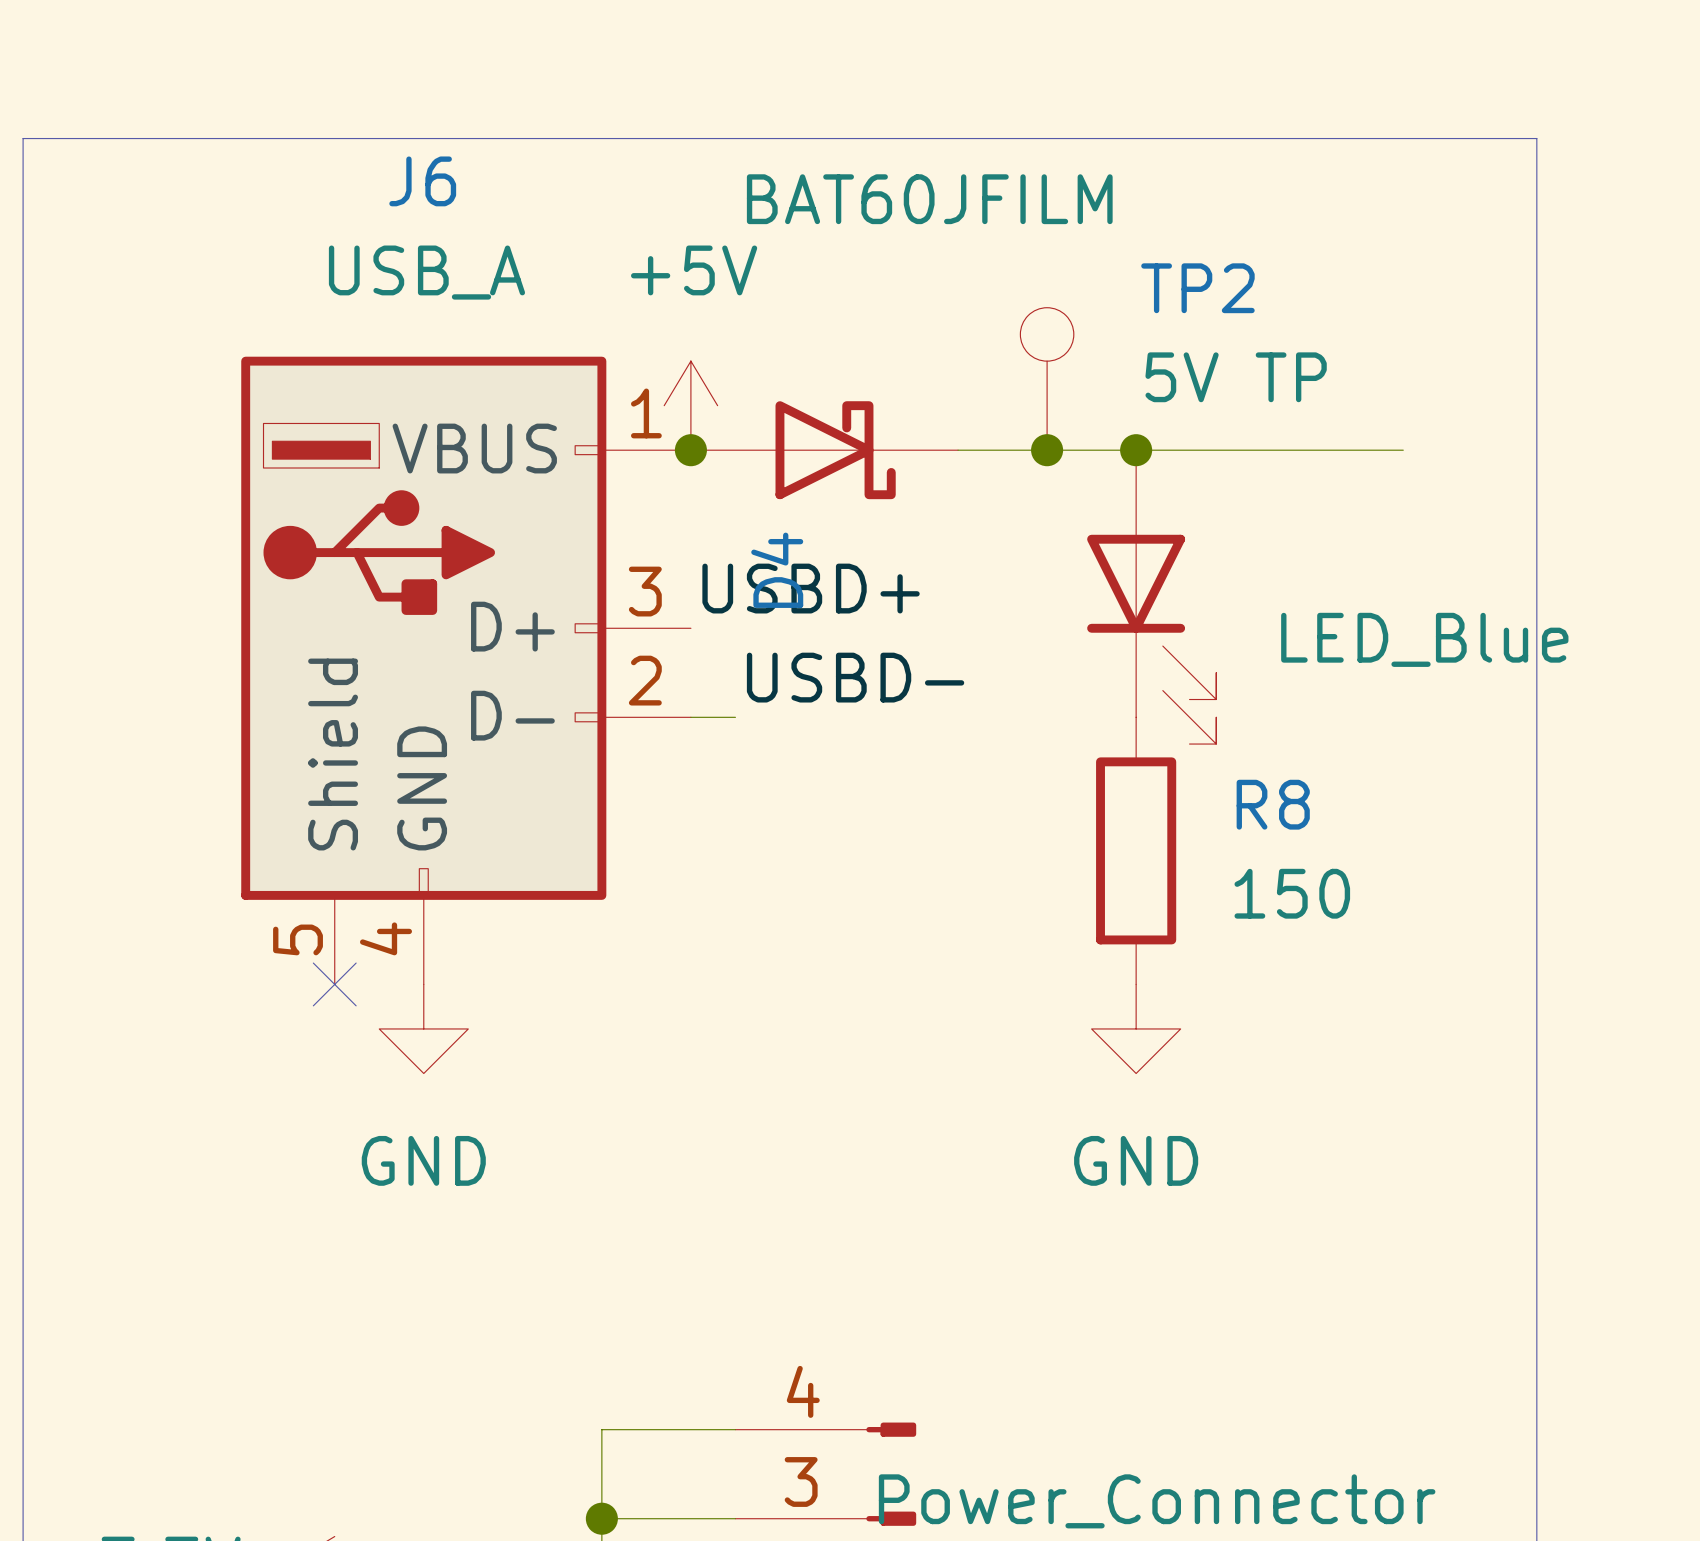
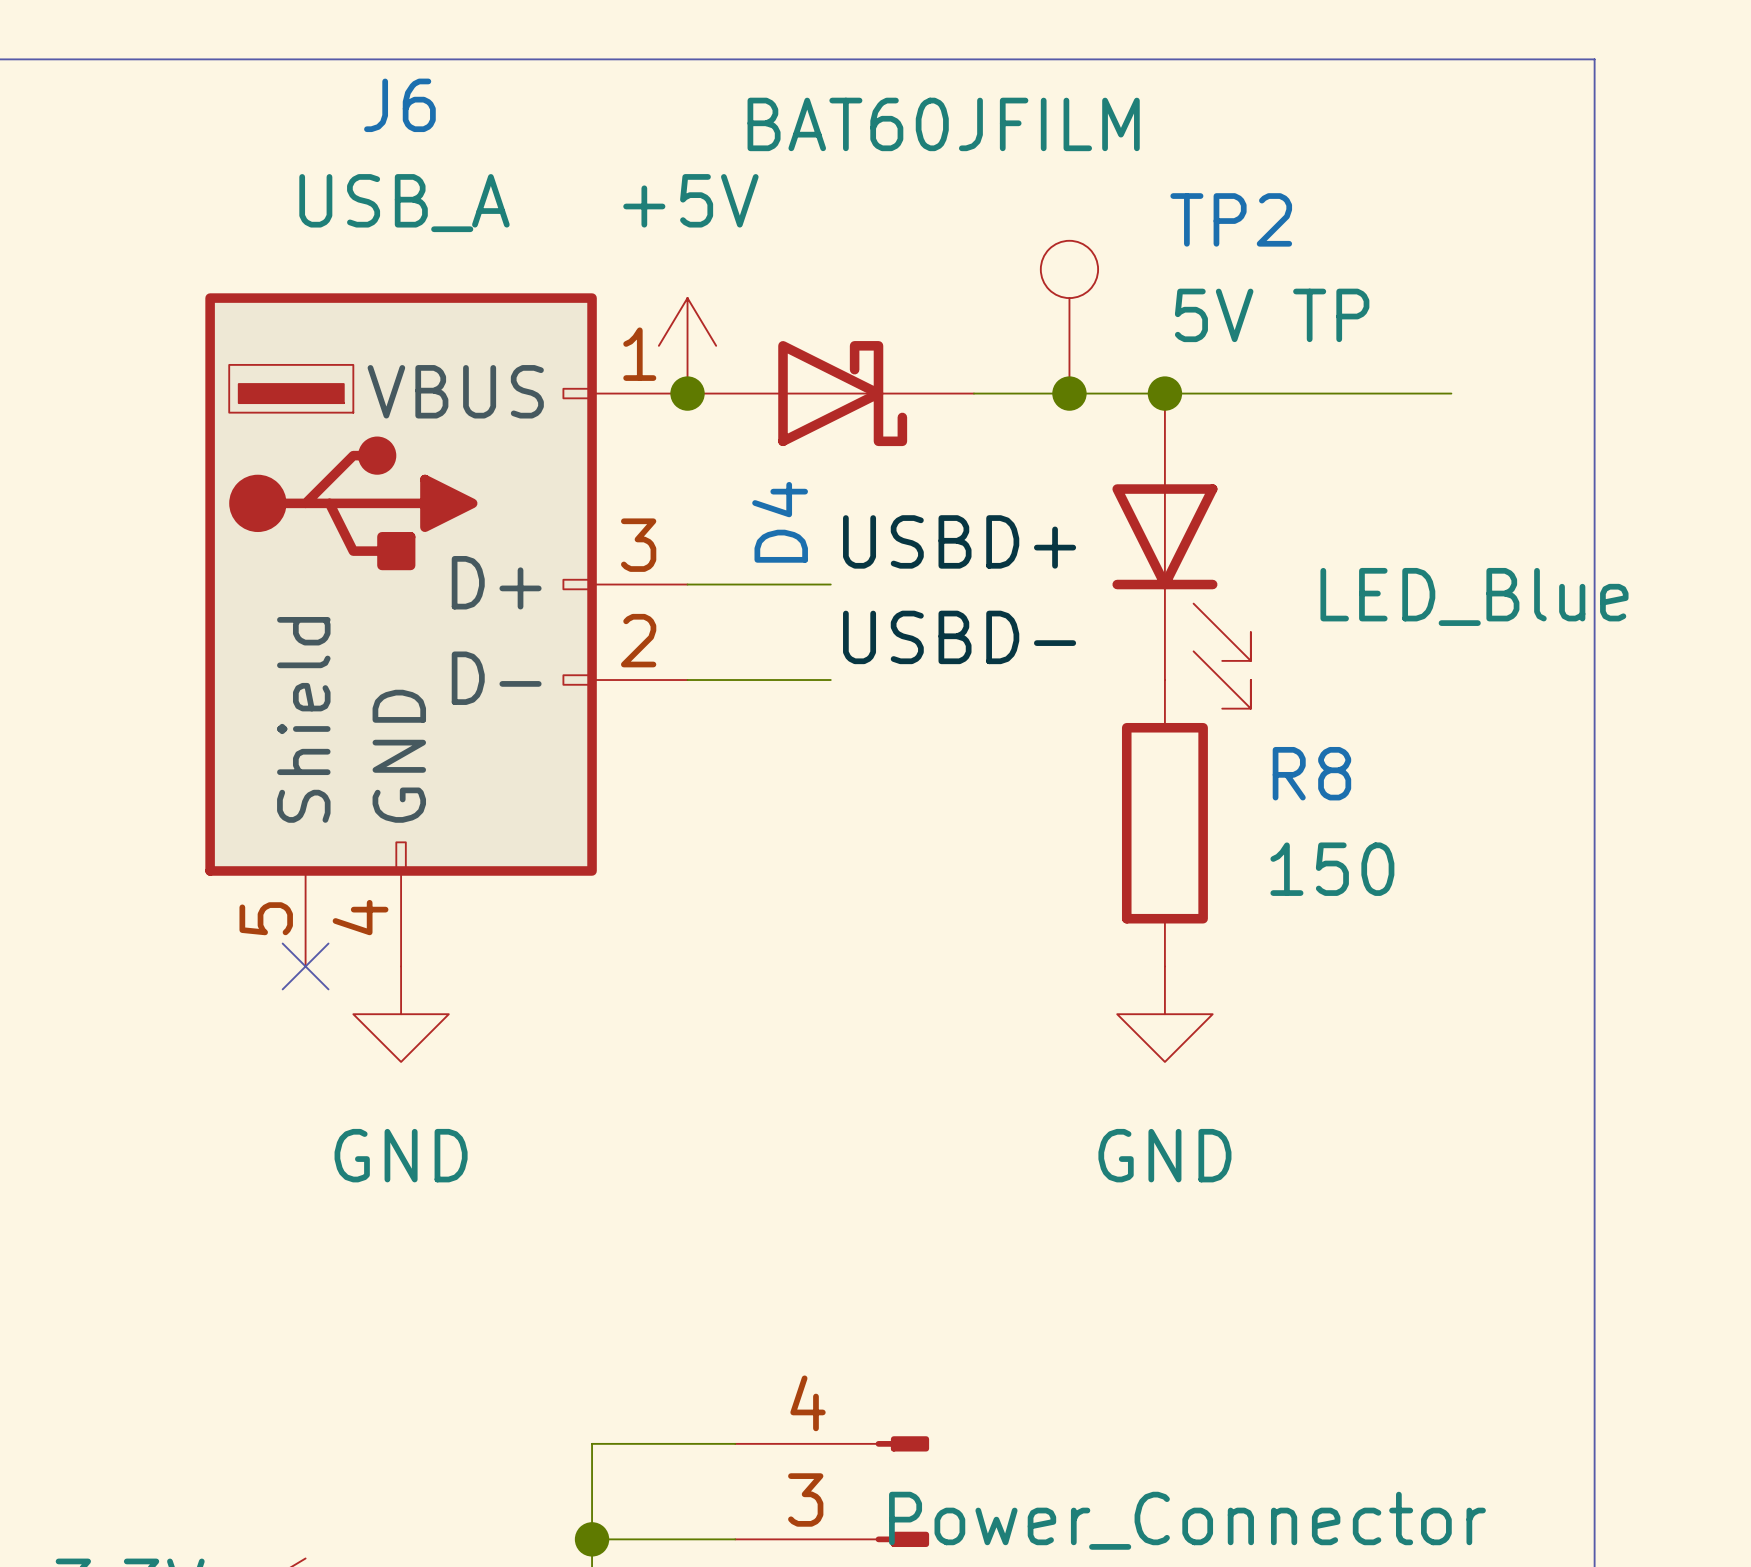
label position: USBD+ (811, 588) -> USBD+ (959, 541)
wire: none -> (687, 584) (830, 584)
label position: USBD- (855, 677) -> USBD- (959, 637)
wire: none -> (735, 680) (830, 680)

